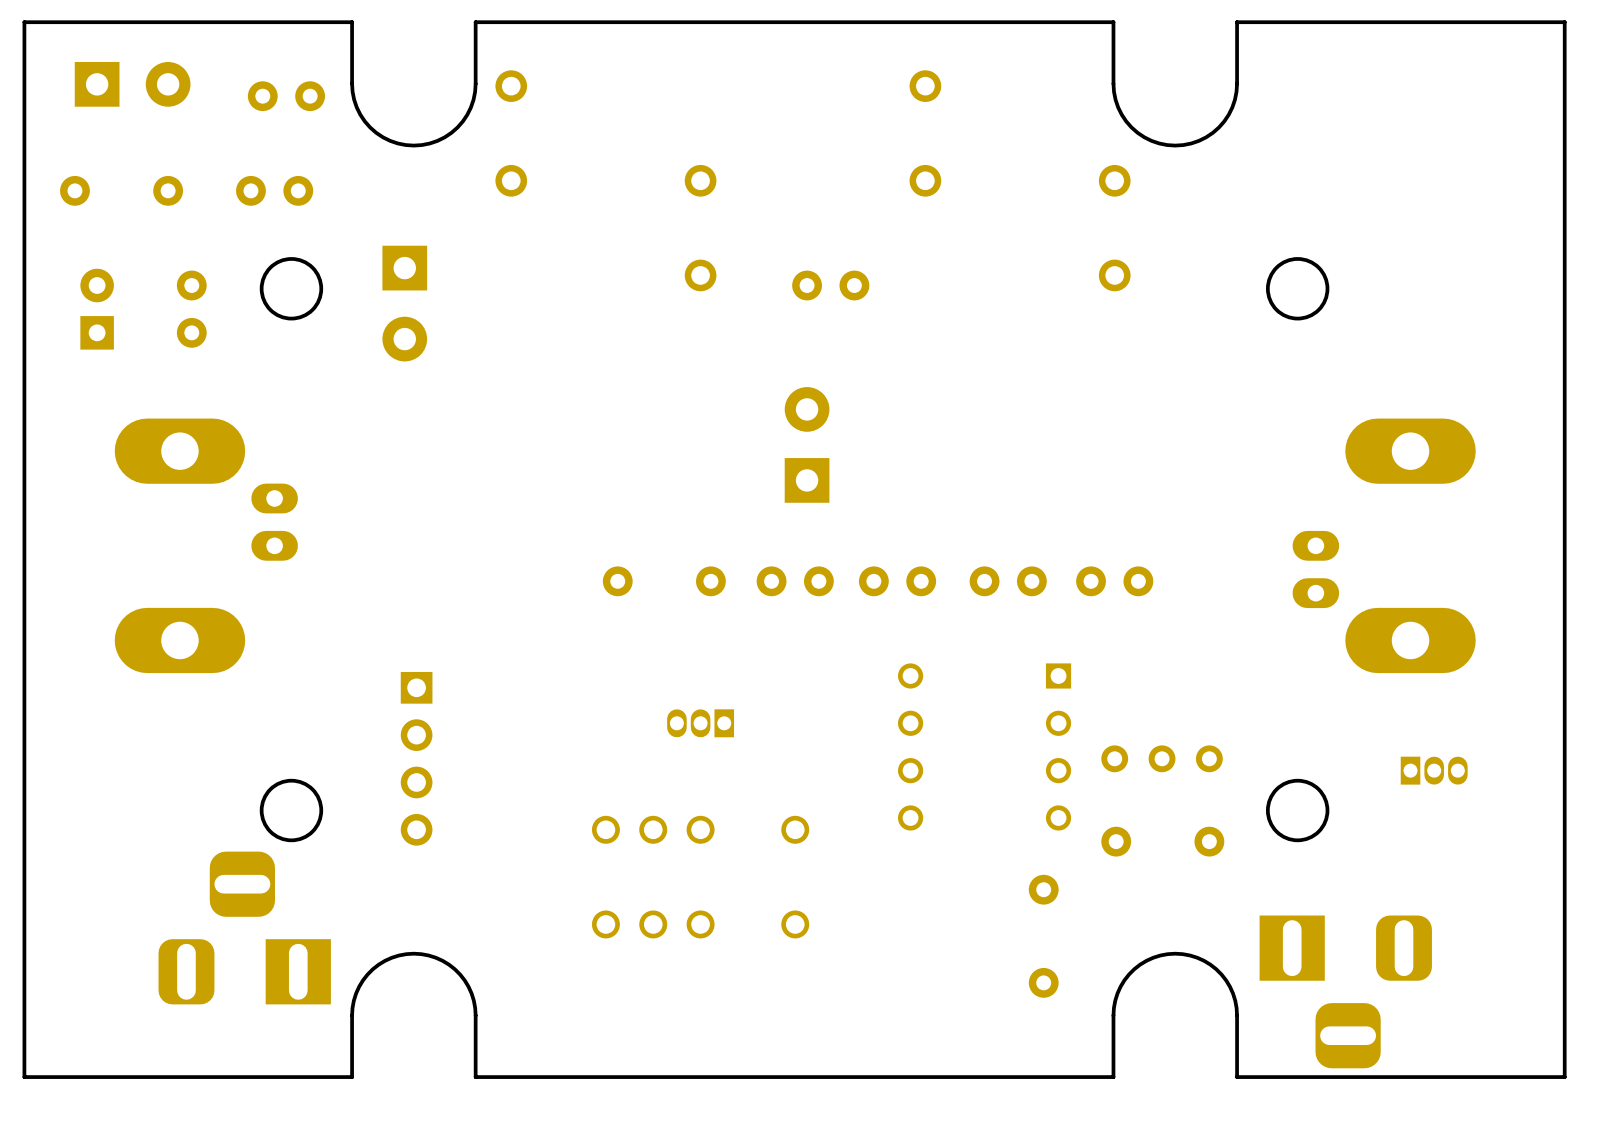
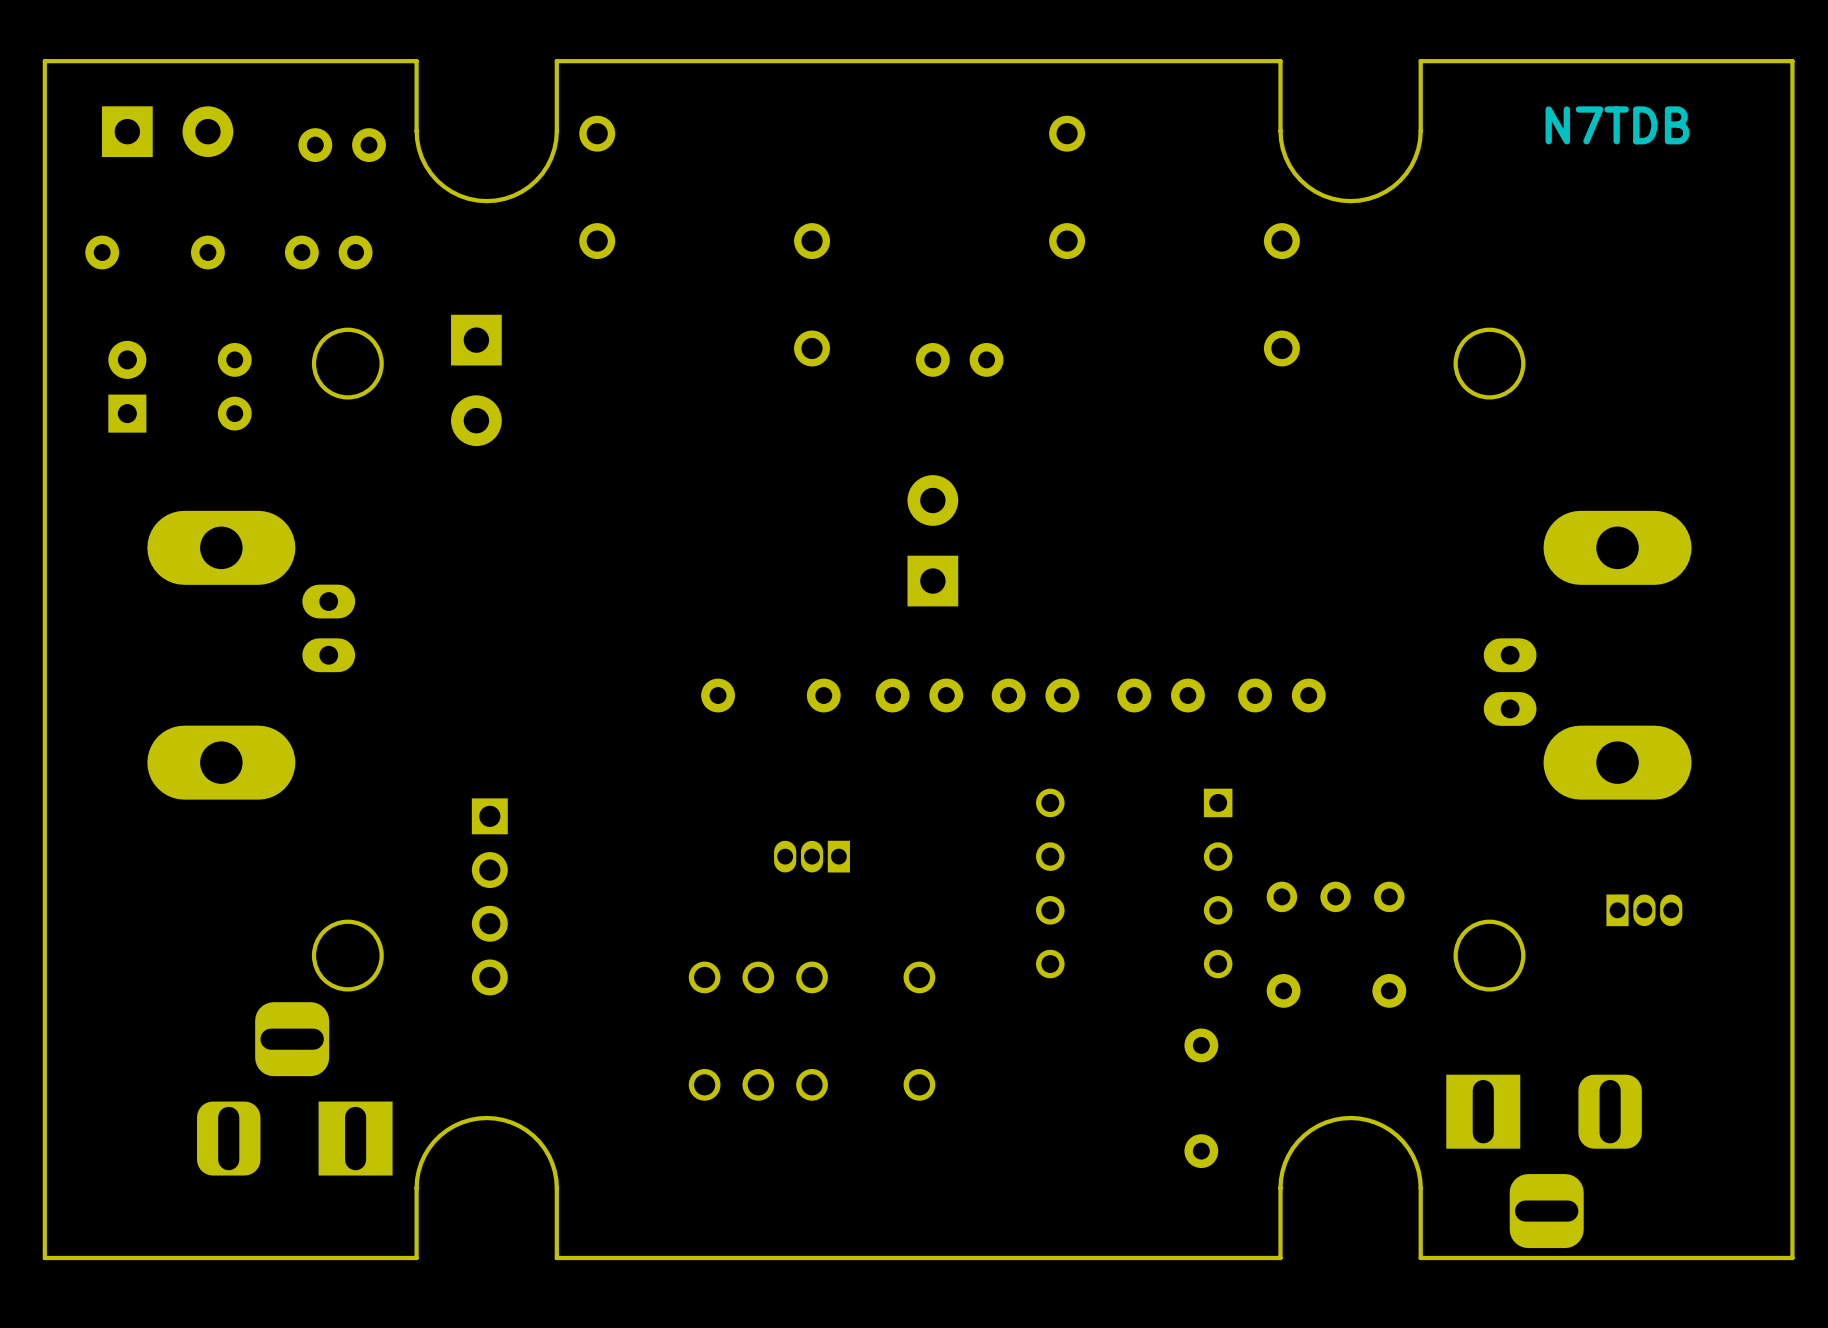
text: none -> N7TDB (1617, 125)

